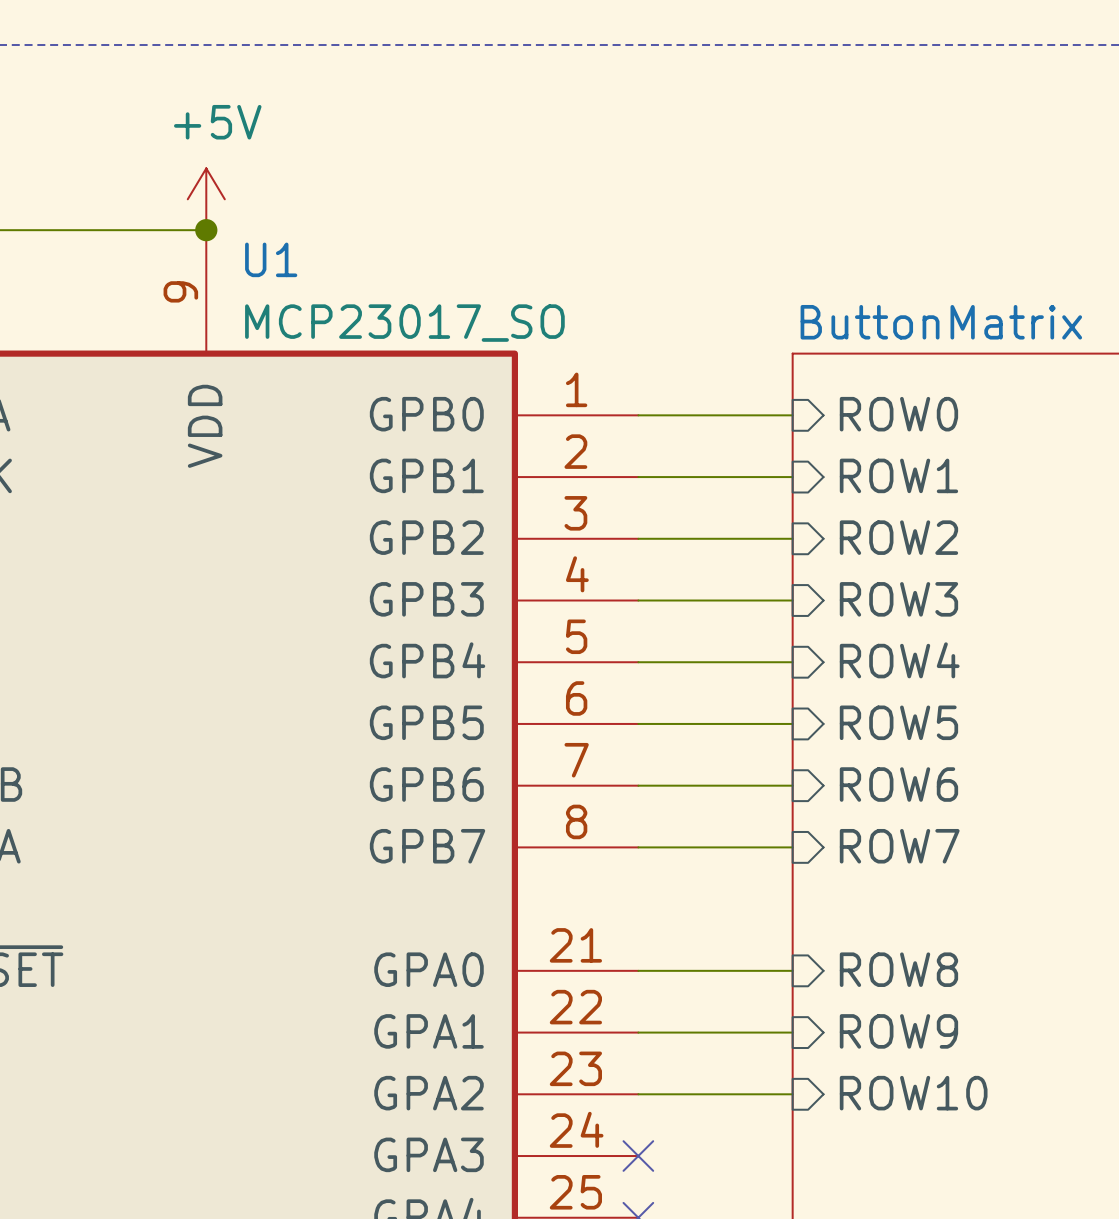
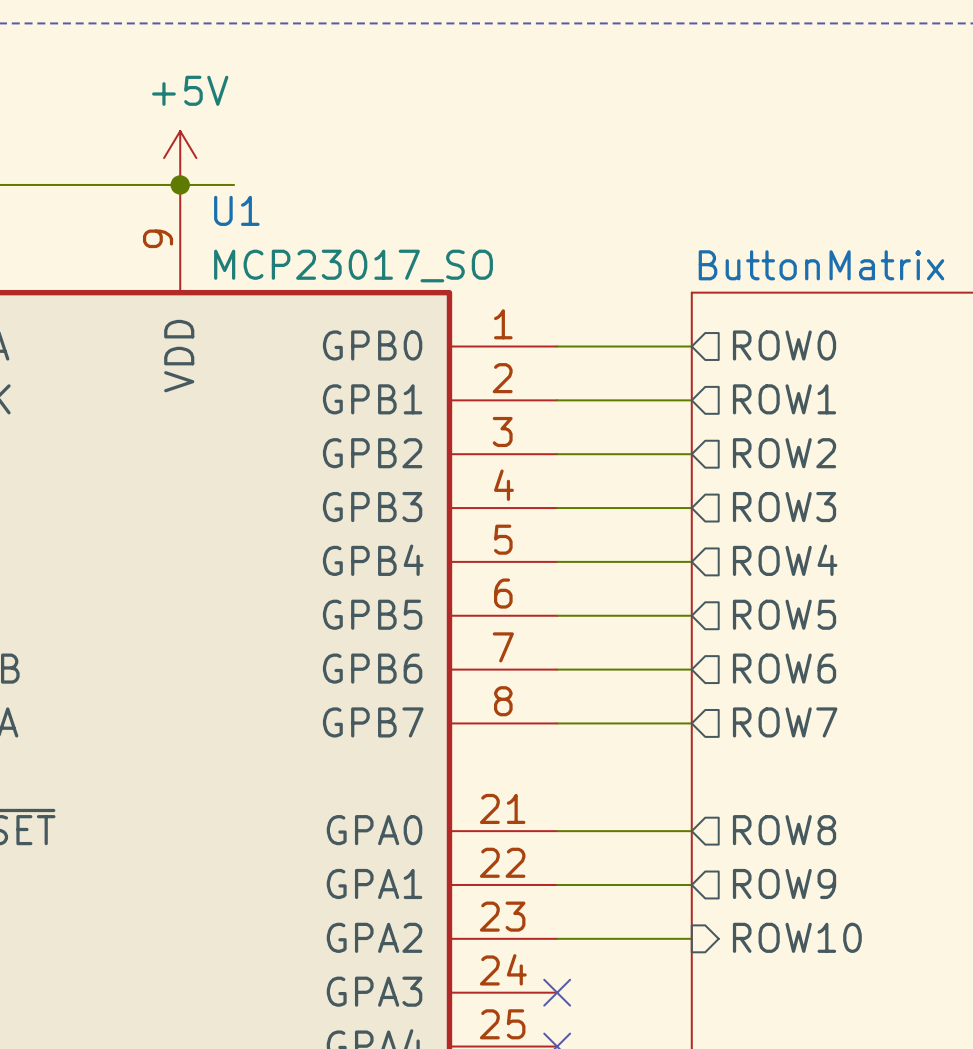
wire: none -> (180, 184) (234, 184)
sheet pin shape: input (898, 414) -> output (784, 345)
sheet pin shape: input (898, 475) -> output (784, 399)
sheet pin shape: input (898, 537) -> output (784, 453)
sheet pin shape: input (898, 599) -> output (784, 507)
sheet pin shape: input (899, 660) -> output (785, 560)
sheet pin shape: input (898, 722) -> output (784, 614)
sheet pin shape: input (898, 784) -> output (784, 668)
sheet pin shape: input (899, 846) -> output (785, 722)
sheet pin shape: input (898, 969) -> output (784, 830)
sheet pin shape: input (898, 1031) -> output (784, 883)

